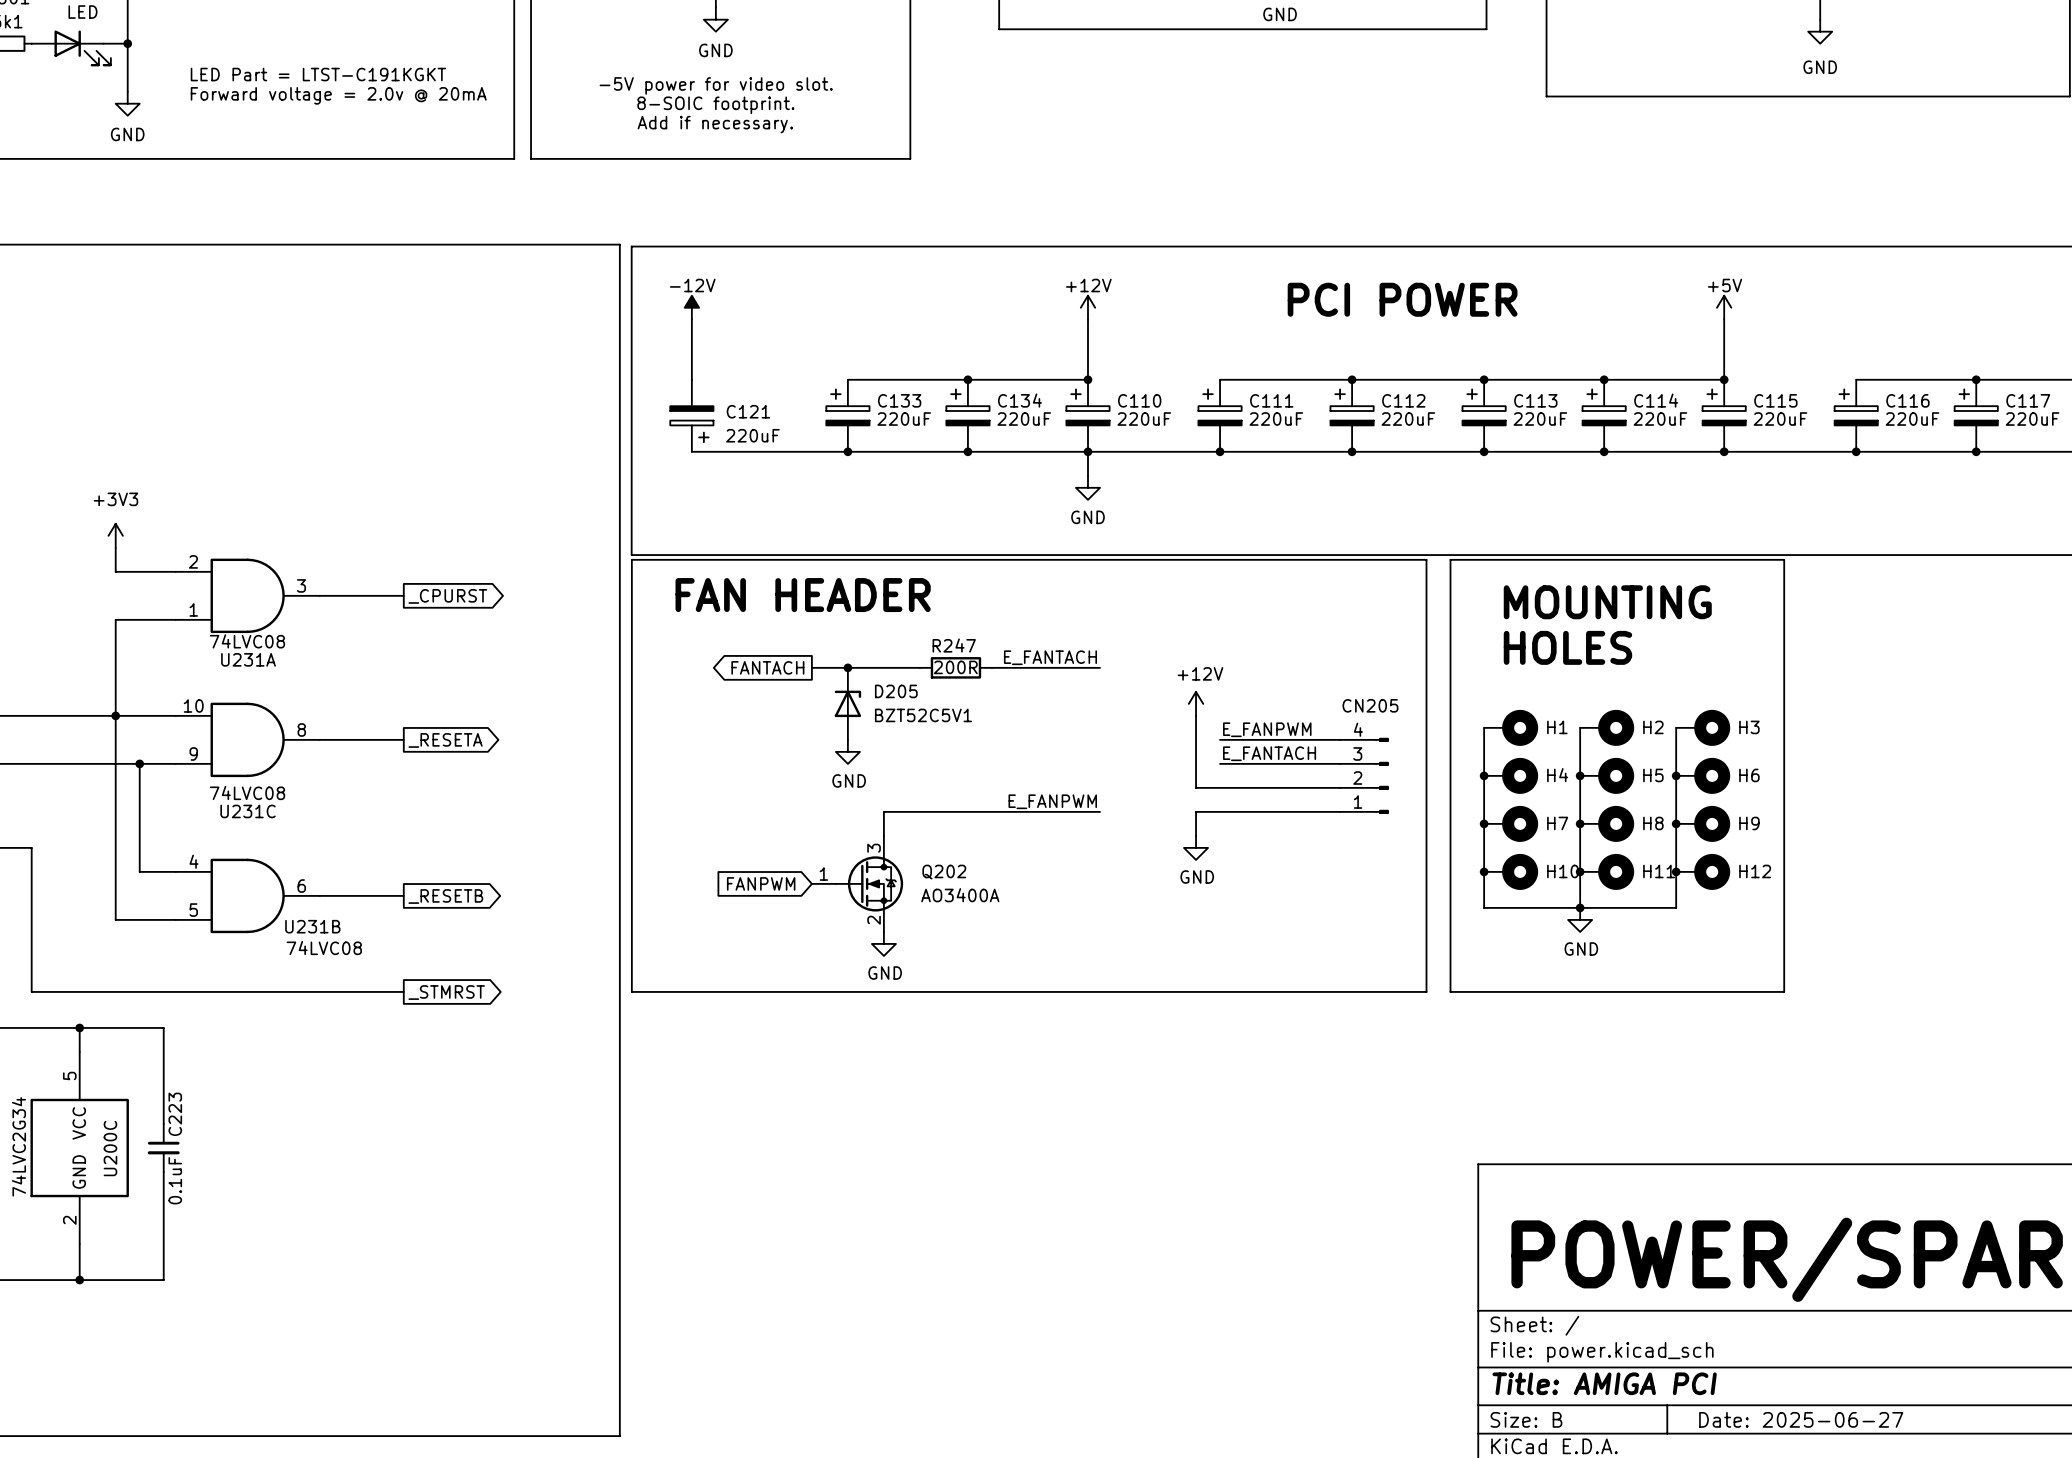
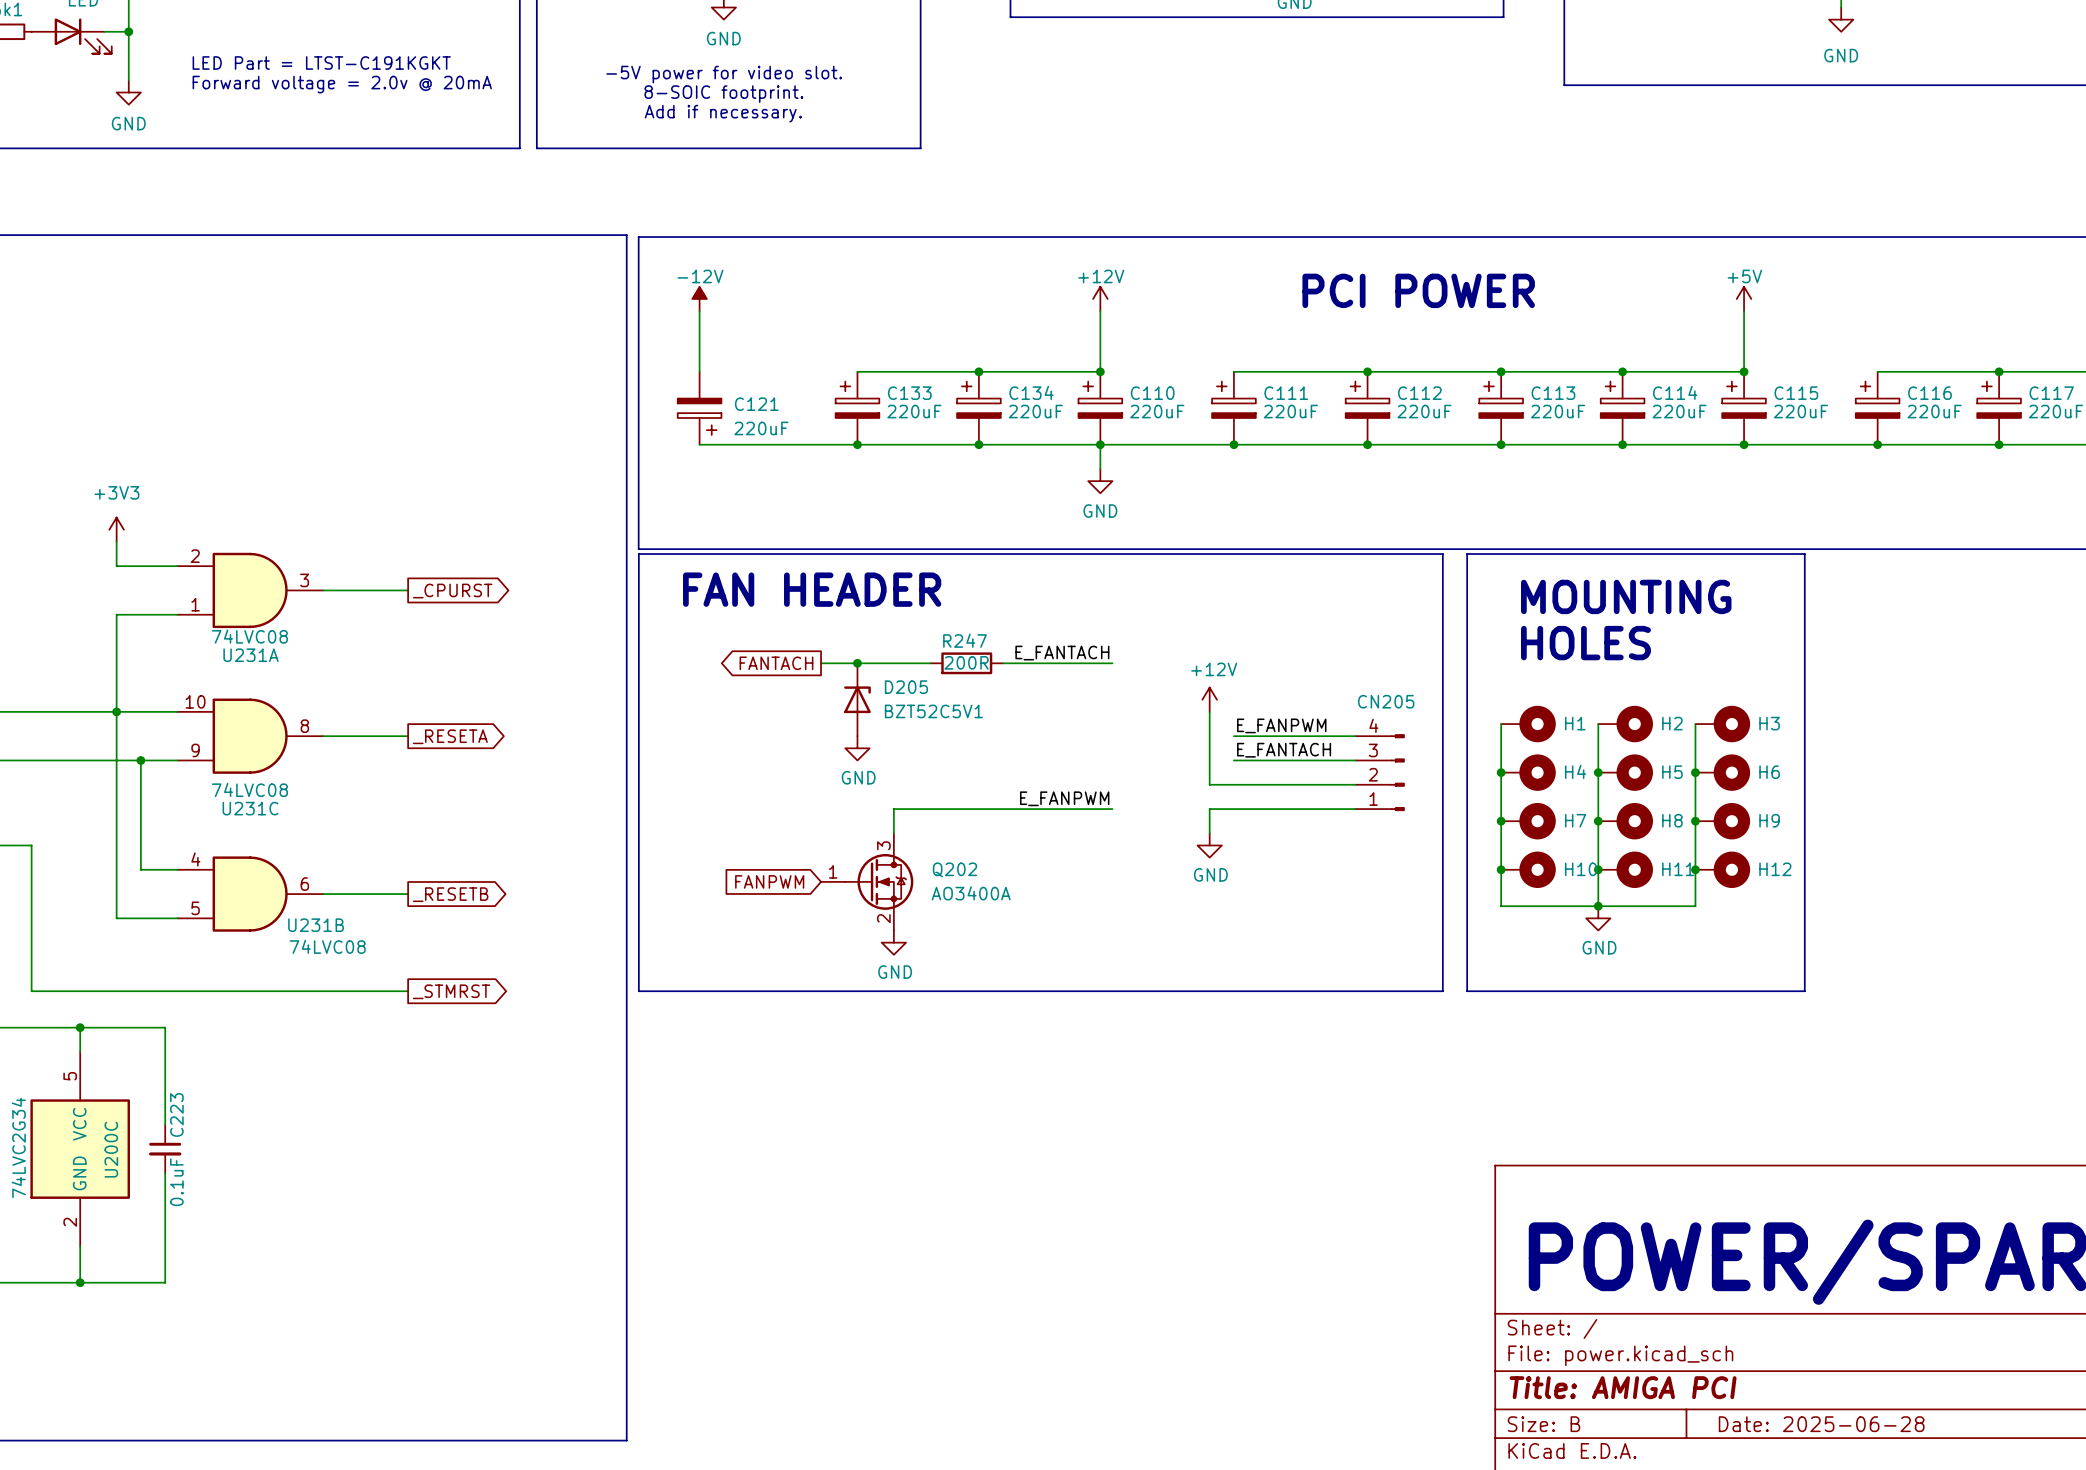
title block: Date: 2025-06-27 (1801, 1419) -> Date: 2025-06-28 (1821, 1424)

